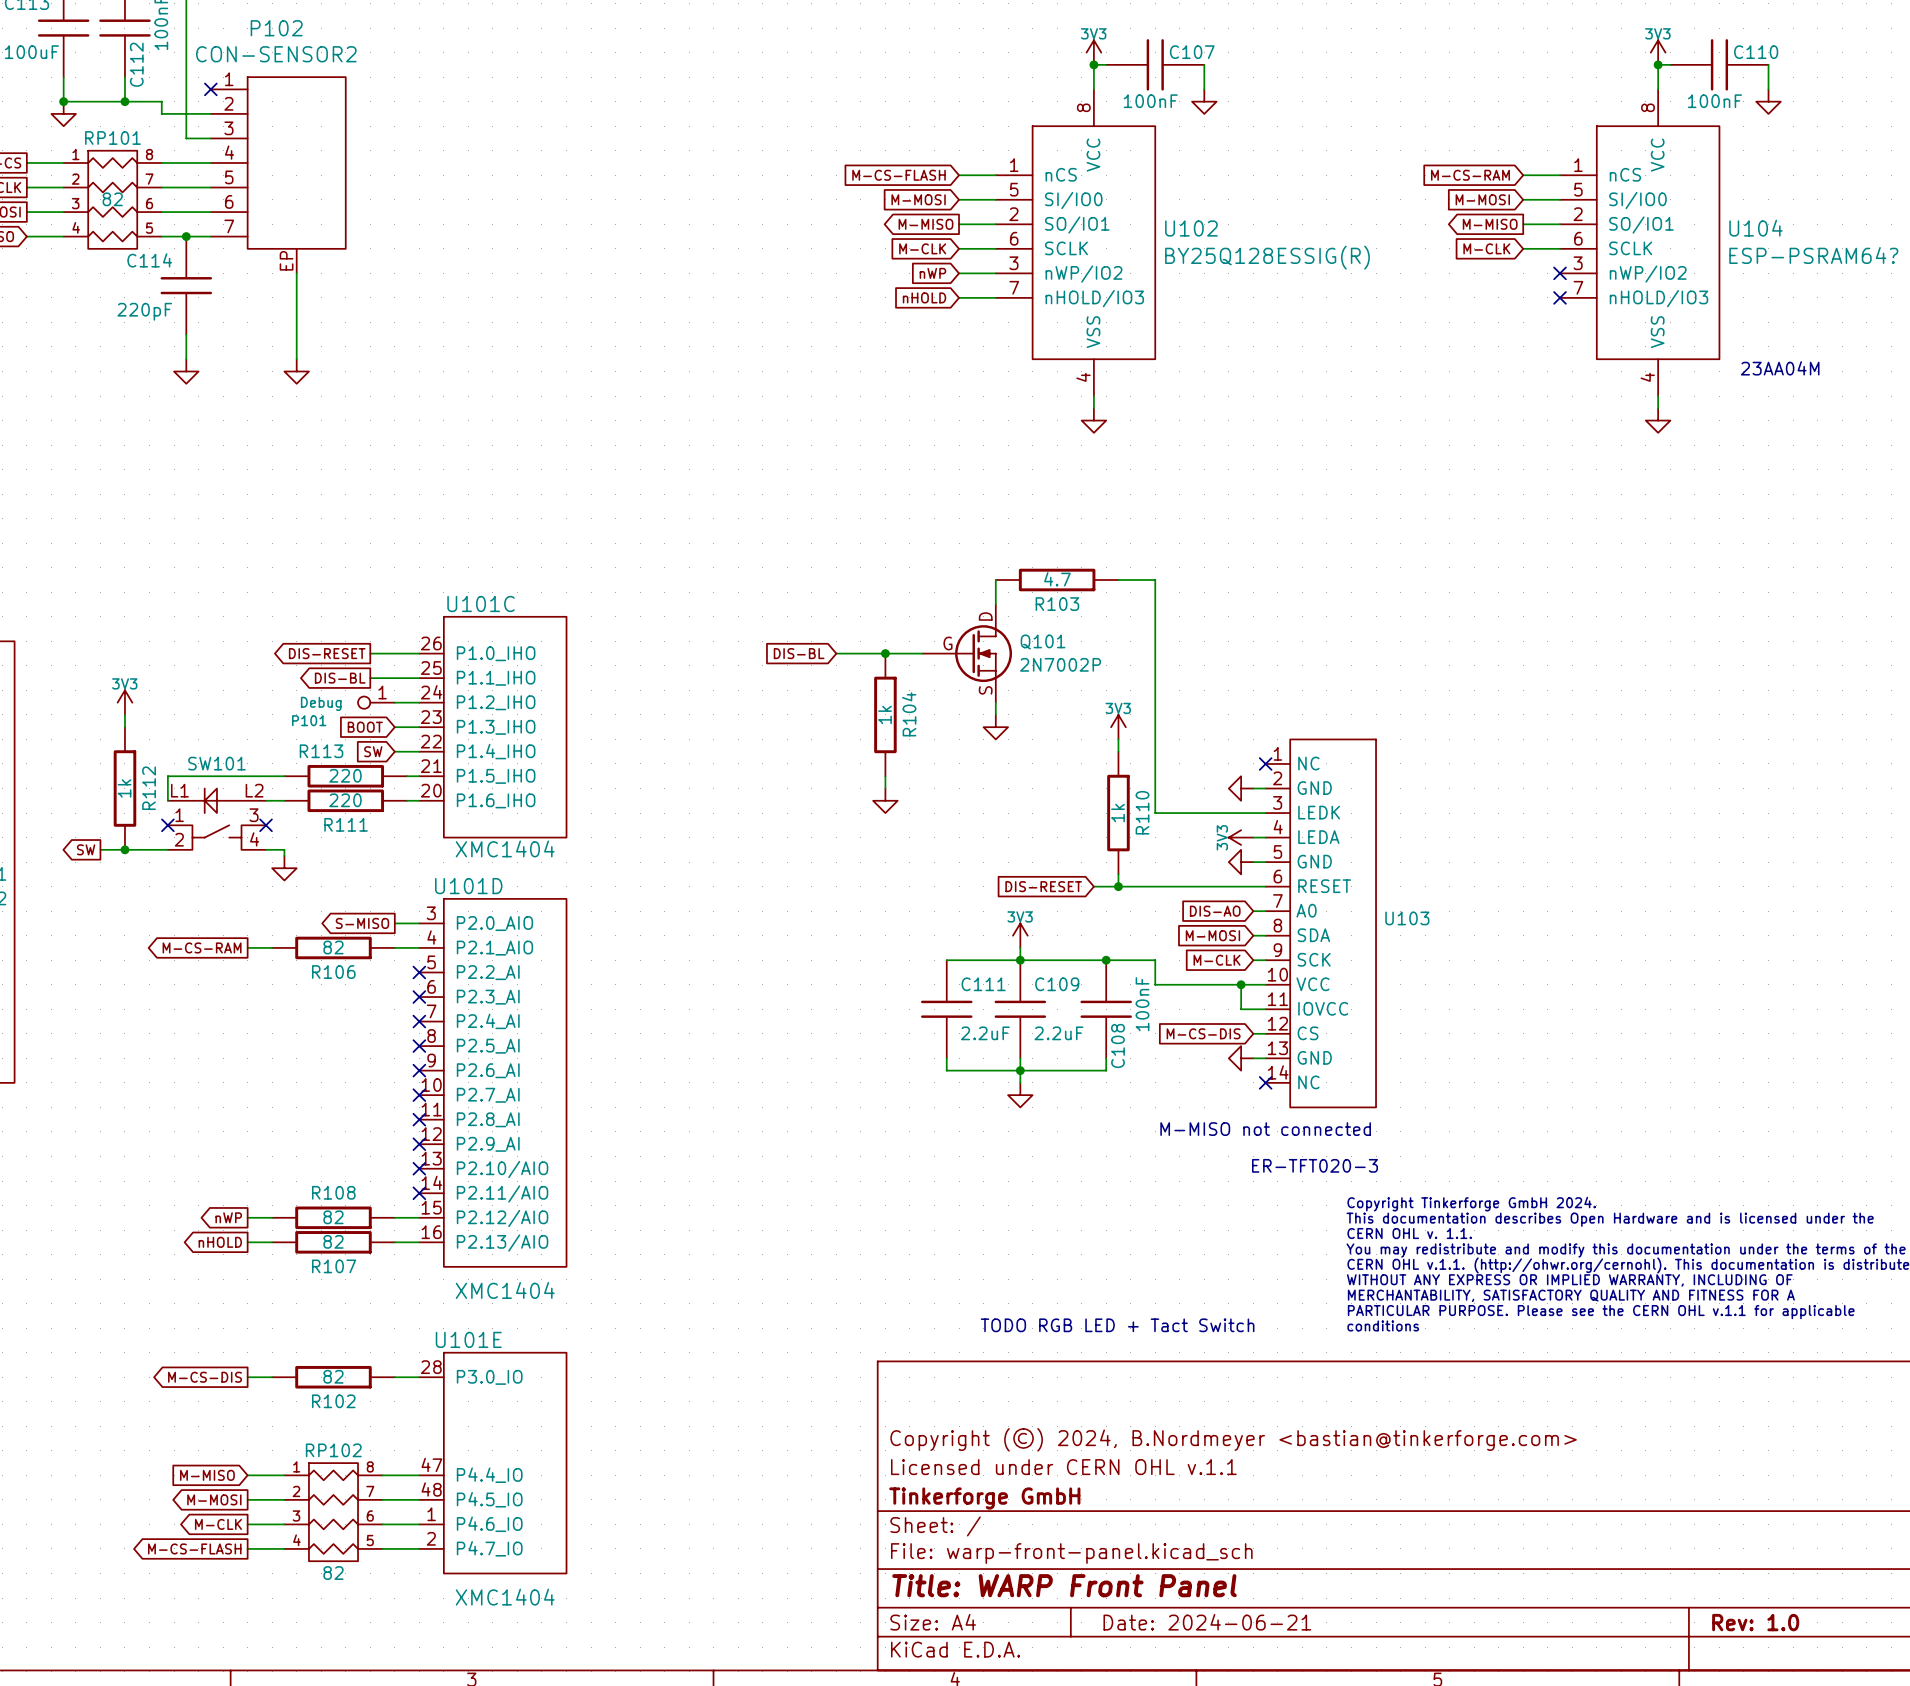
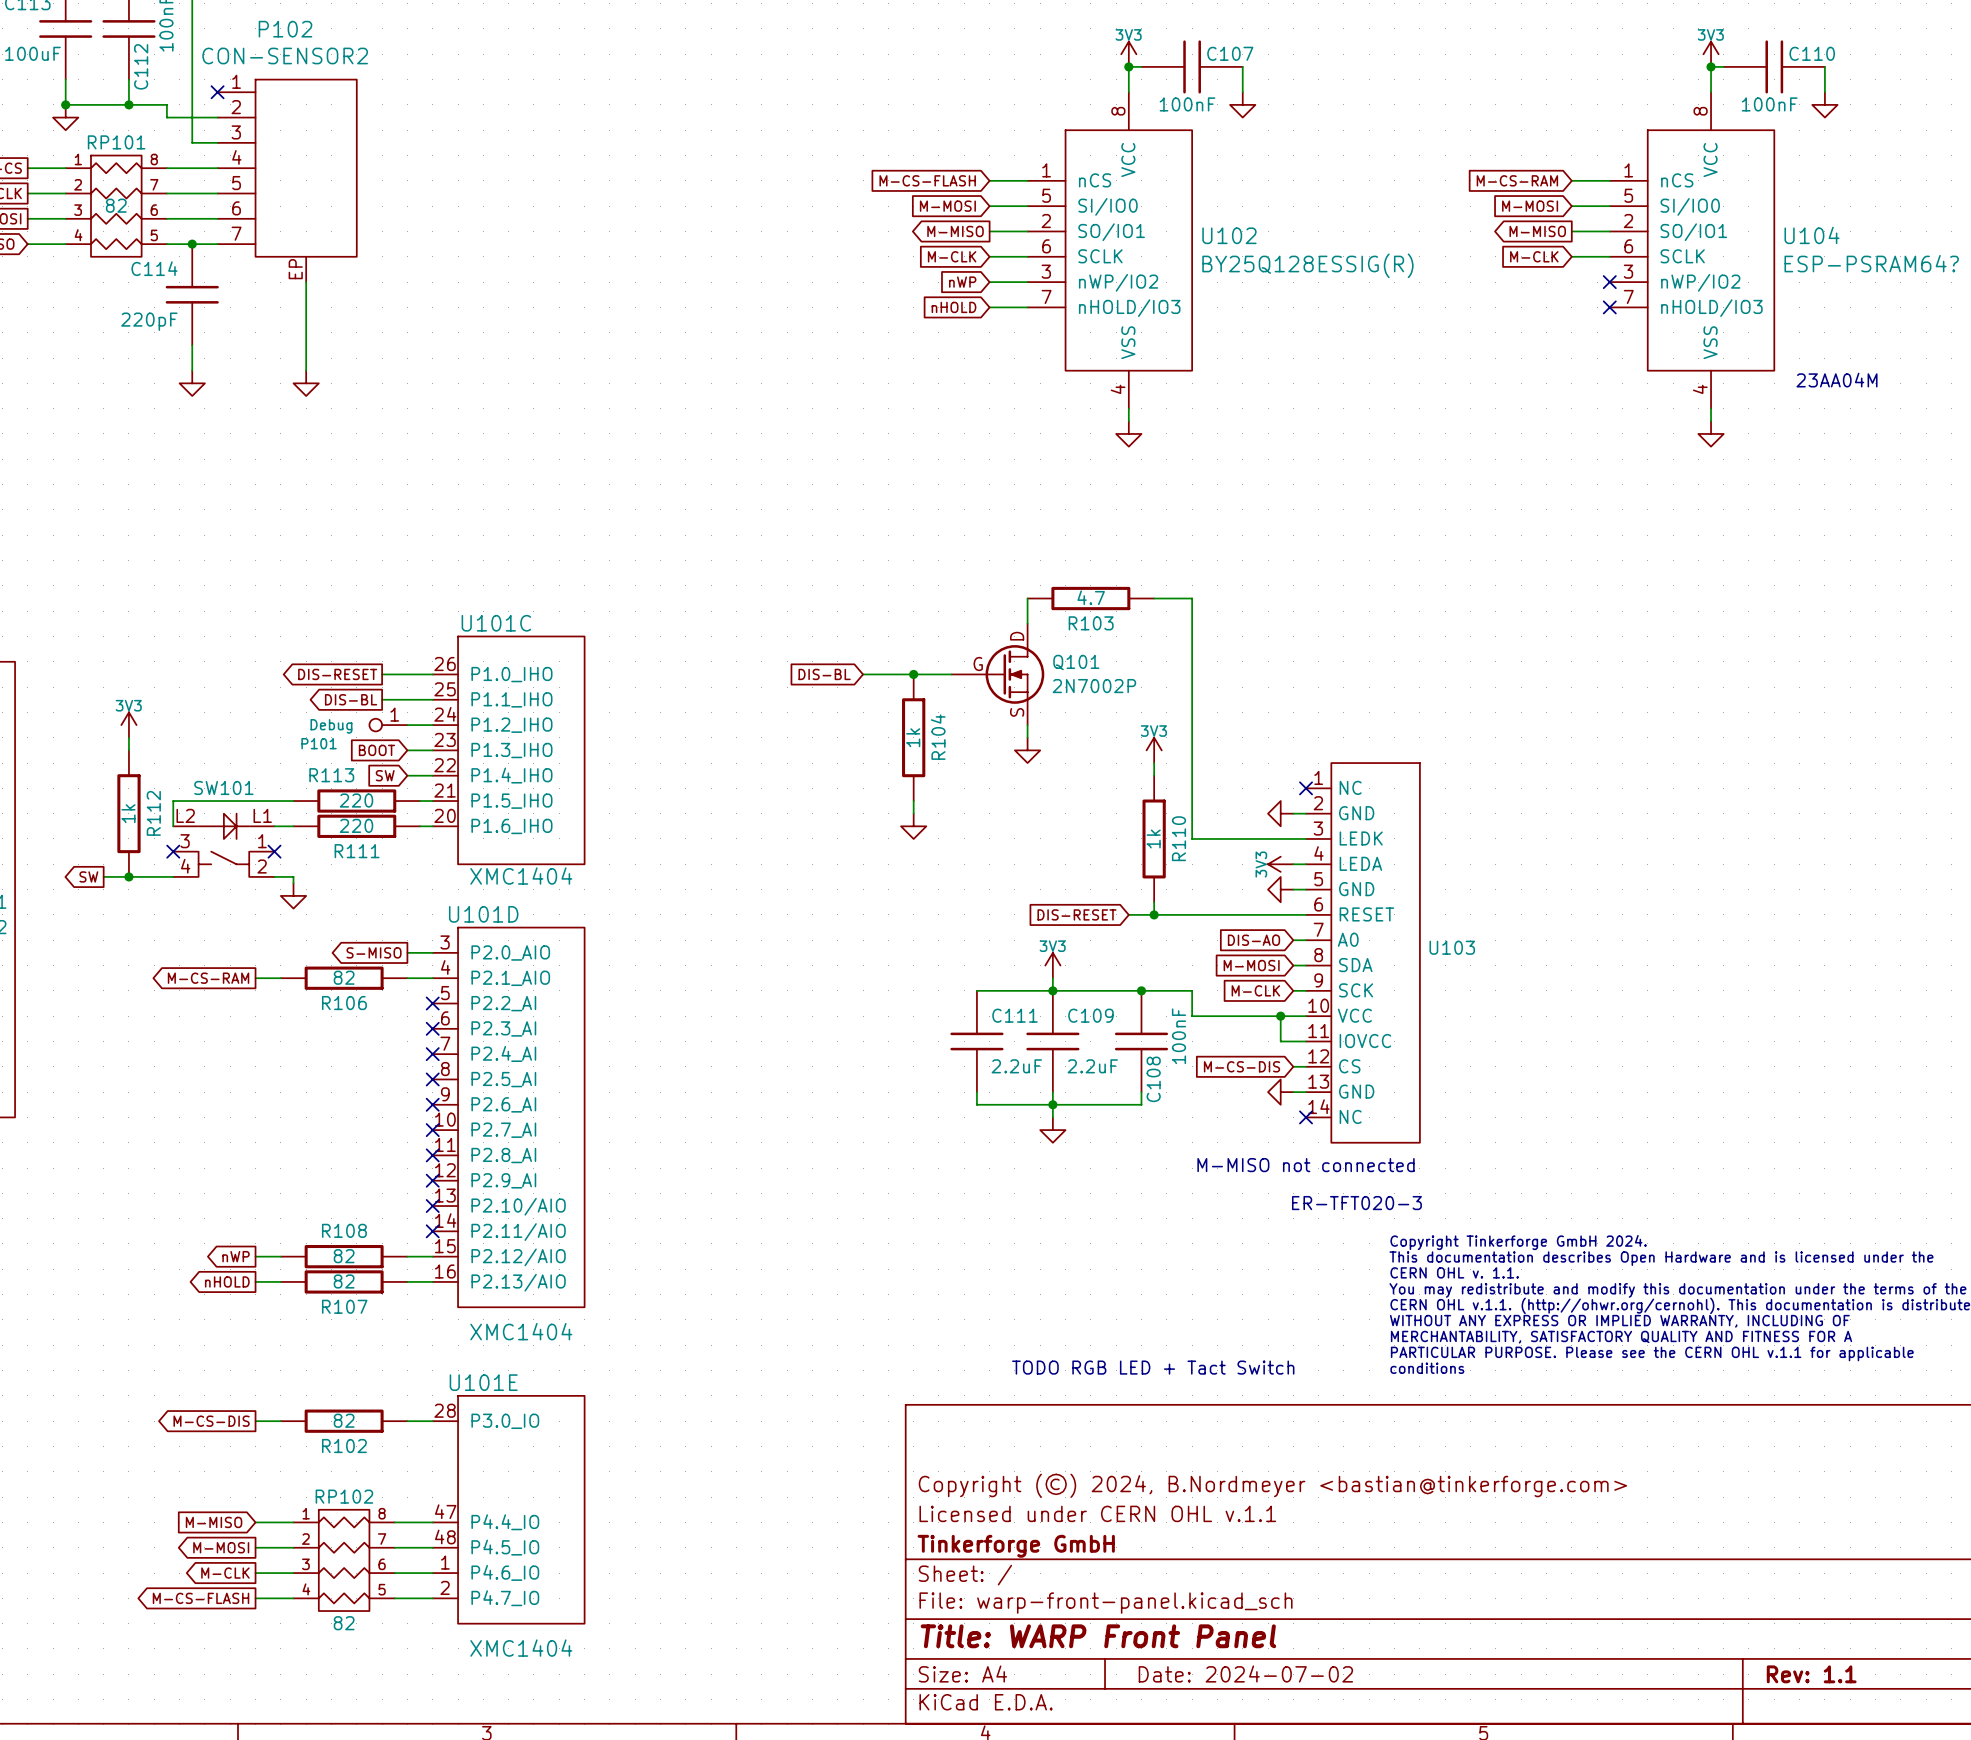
SW101 flip: as is (216, 819) -> left-right (223, 845)
title block: Date: 2024-06-21 (1207, 1622) -> Date: 2024-07-02 (1245, 1673)
title block: Rev: 1.0 (1755, 1622) -> Rev: 1.1 (1811, 1674)

